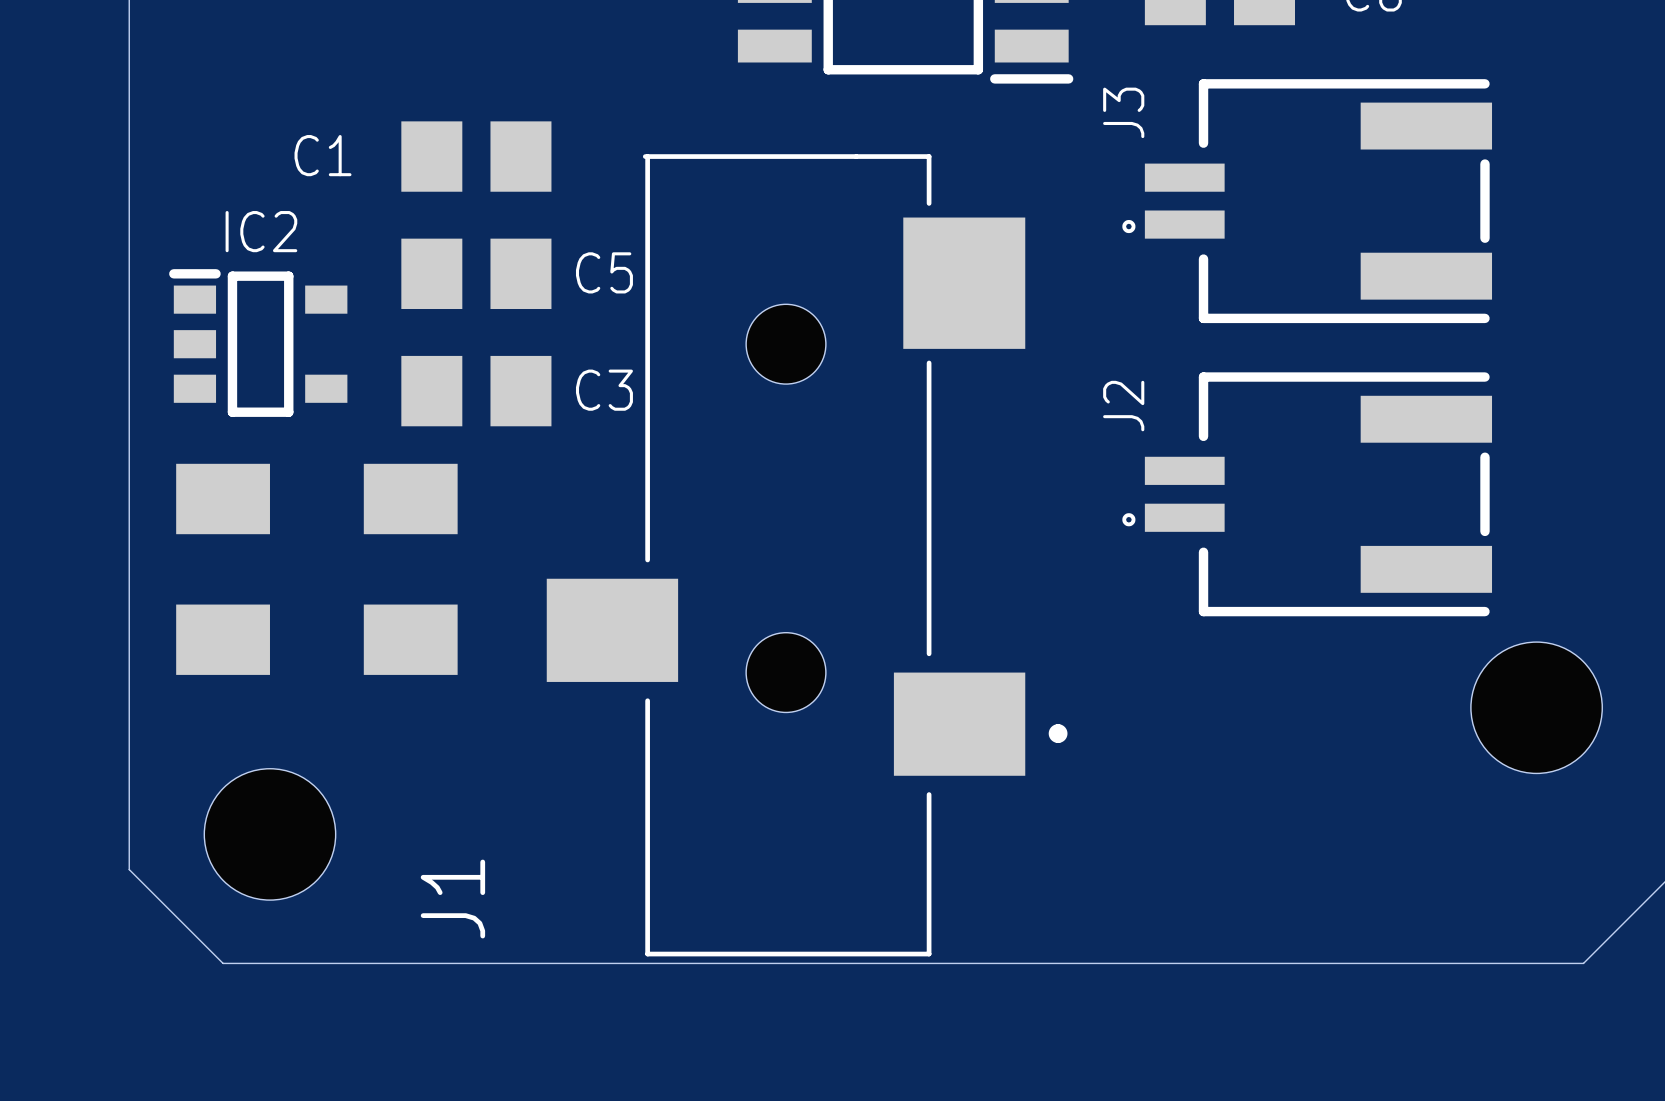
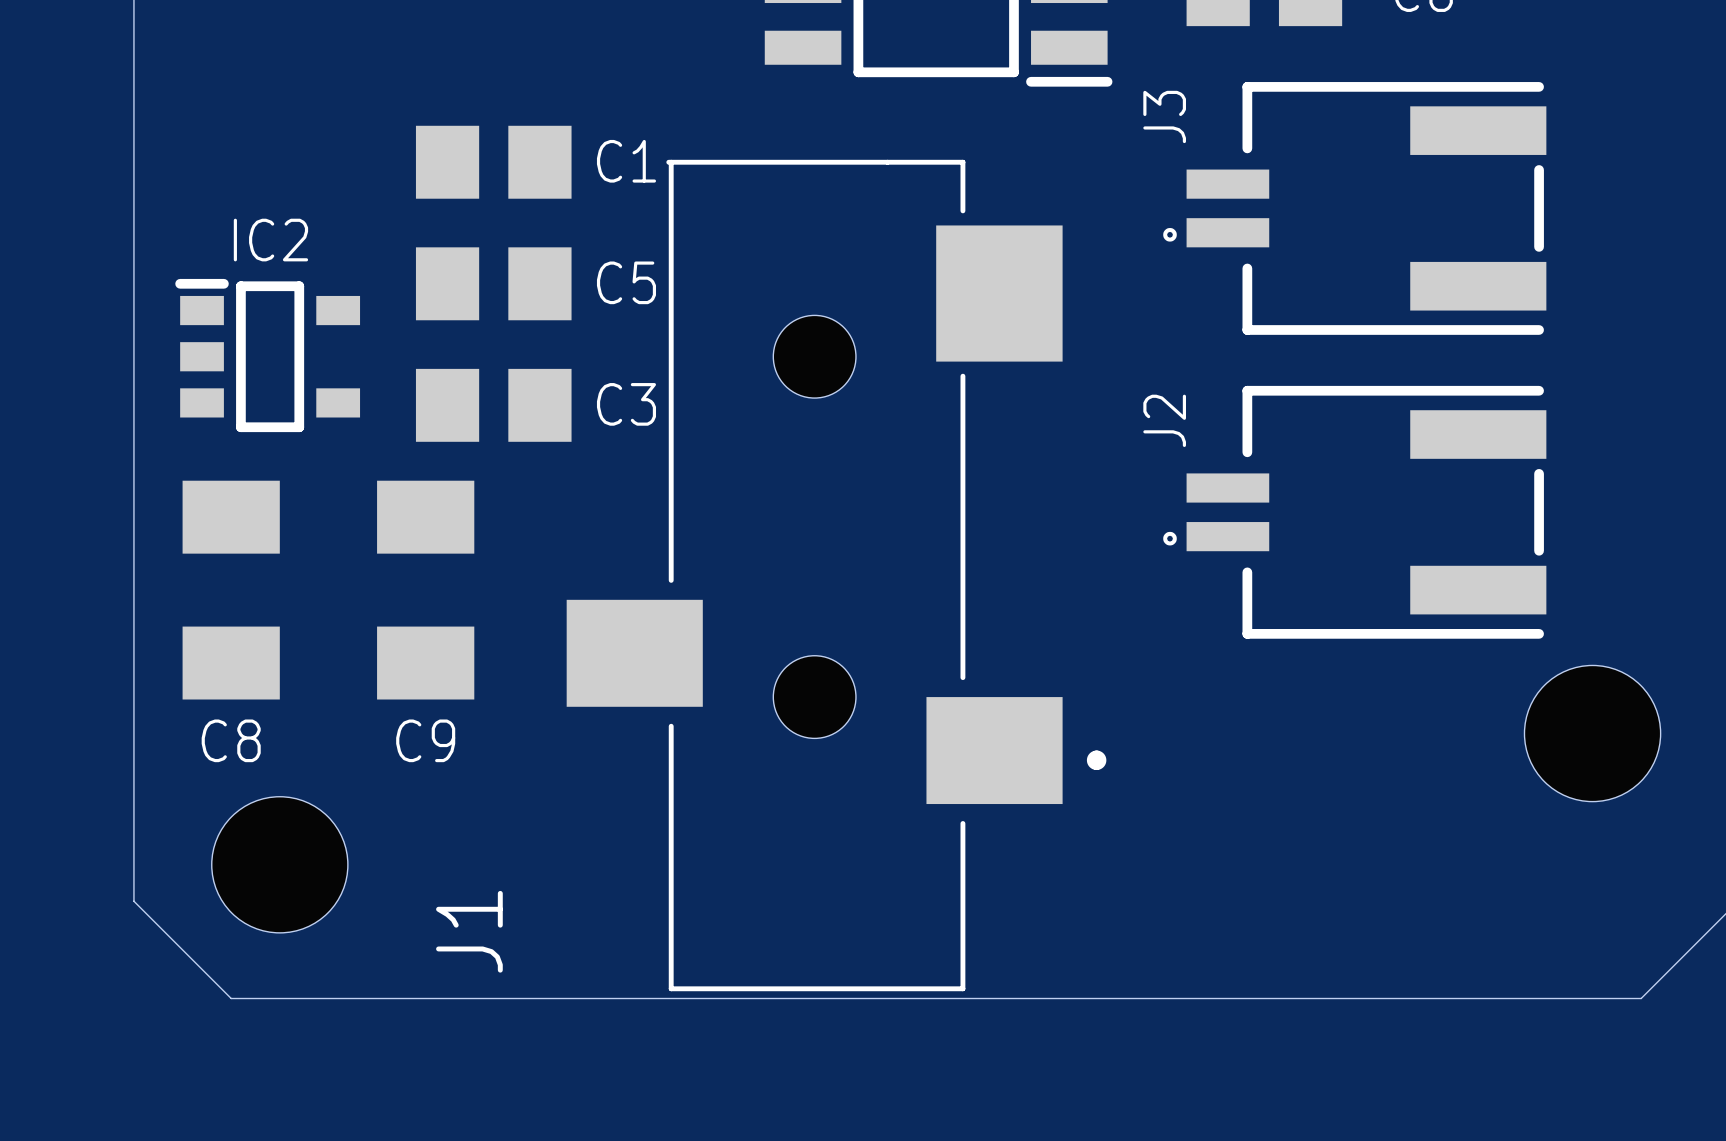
C1 name position: C1 (322, 155) -> C1 (626, 161)
part value: none -> C8 (231, 740)
part value: none -> C9 (425, 740)

